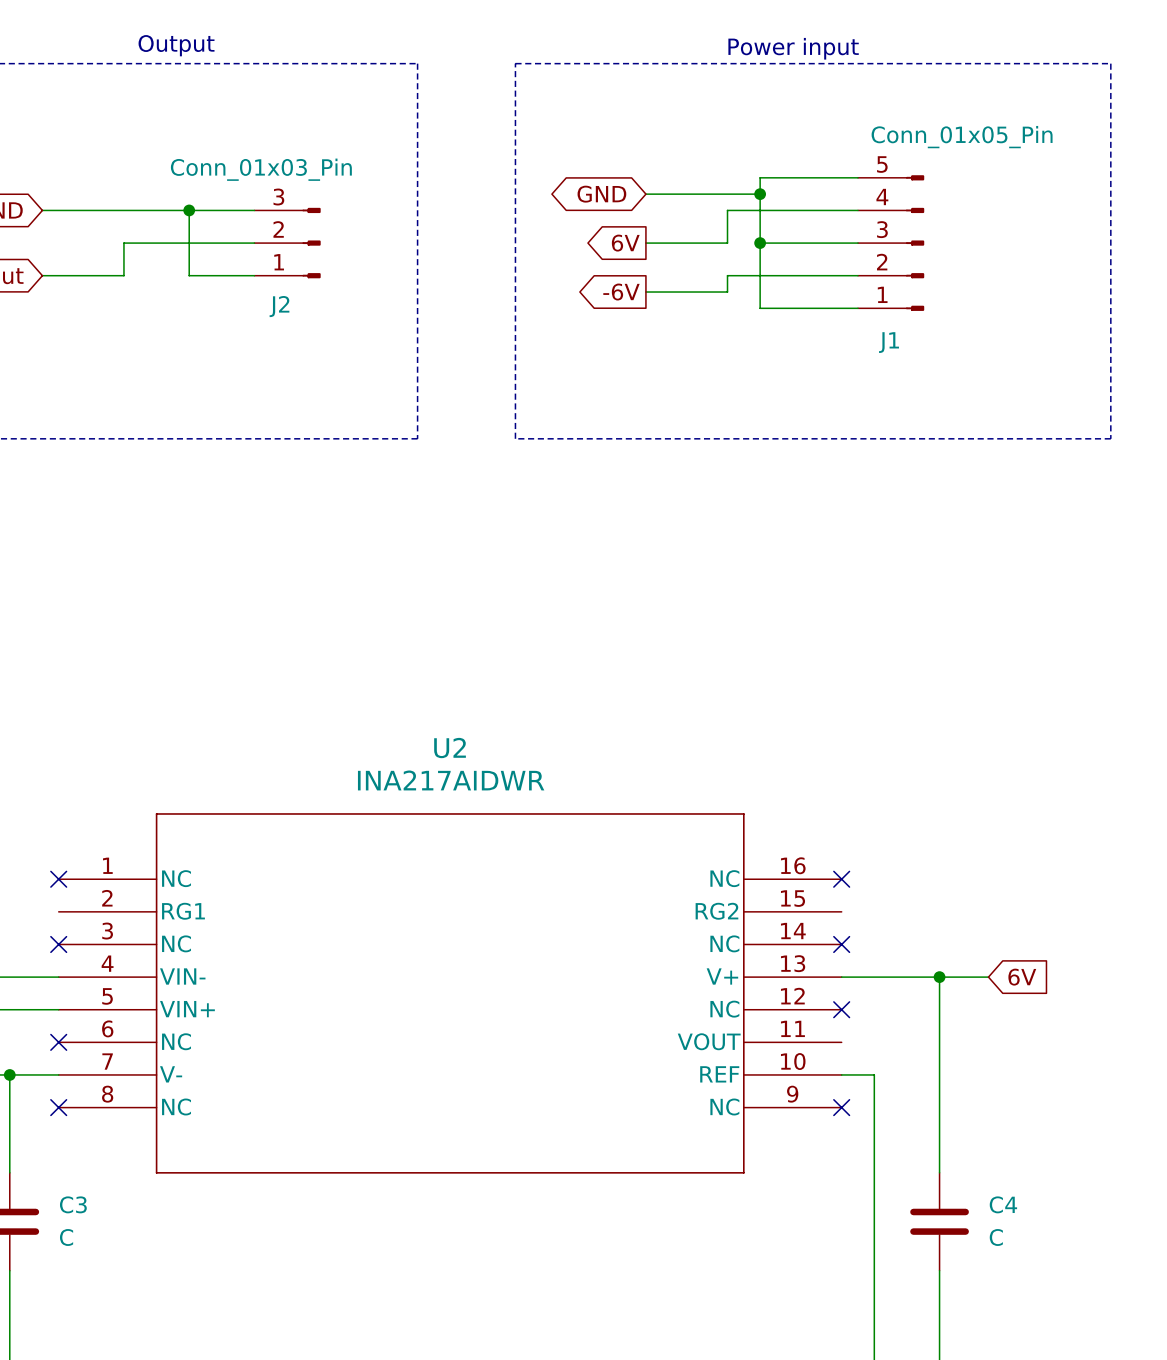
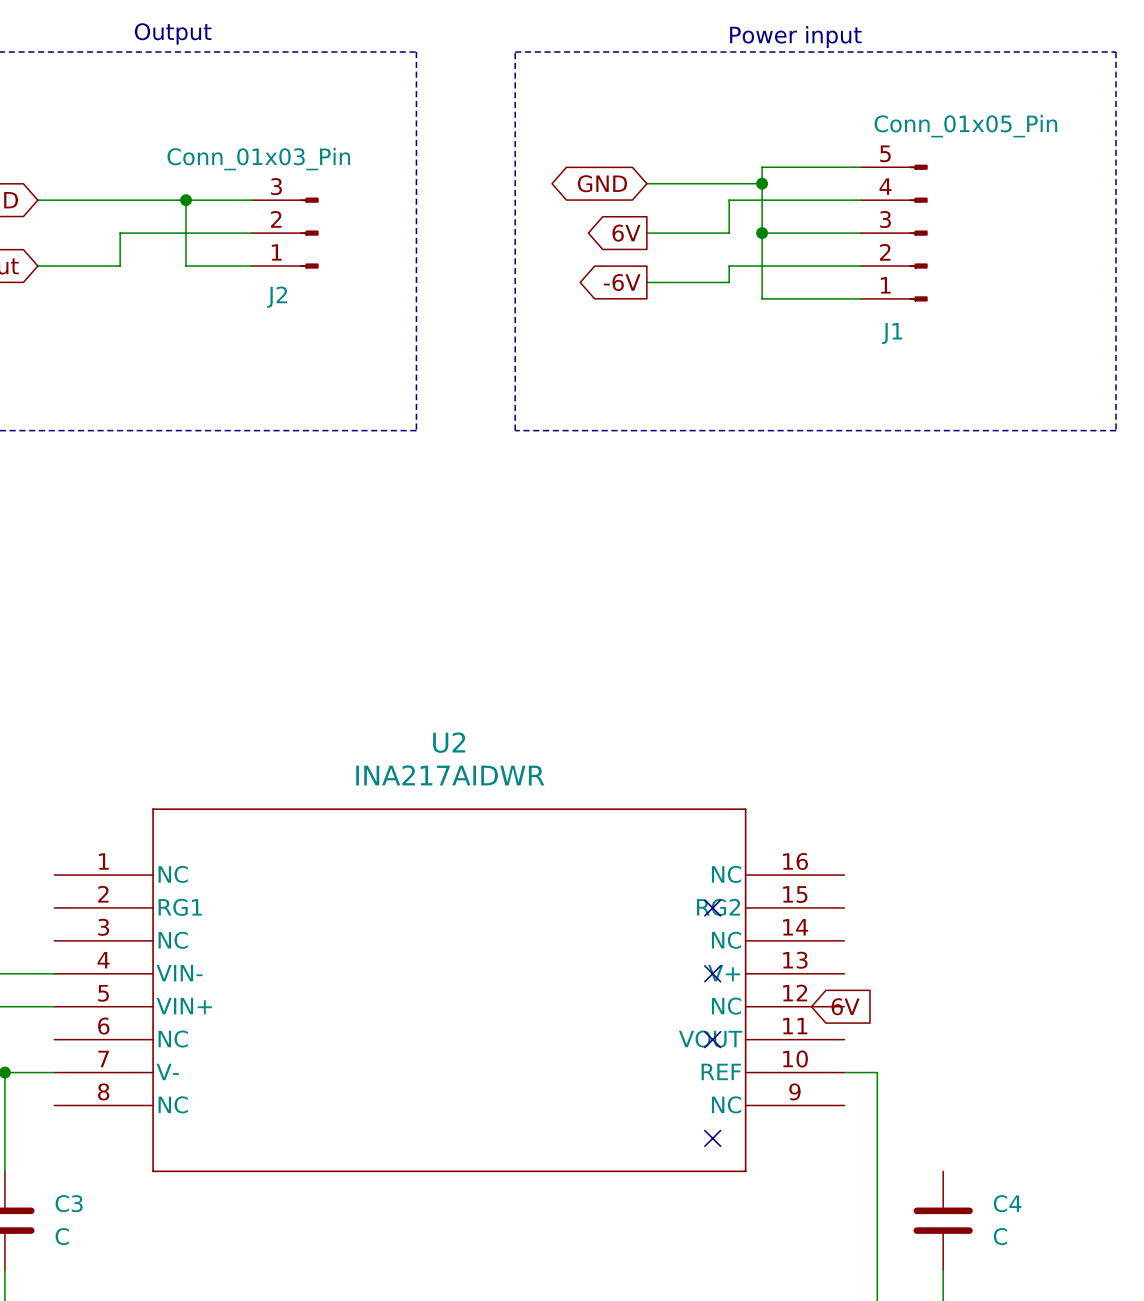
no-connect mark: (58, 879) -> none
no-connect mark: (841, 879) -> none
no-connect mark: none -> (712, 907)
no-connect mark: (58, 944) -> none
no-connect mark: (841, 944) -> none
no-connect mark: none -> (712, 973)
wire: (841, 977) (988, 977) -> none
wire: (939, 977) (939, 1172) -> none
junction: (939, 977) -> none
global label position: 6V (1022, 977) -> 6V (845, 1006)
no-connect mark: (841, 1009) -> none
no-connect mark: (58, 1042) -> none
no-connect mark: none -> (712, 1039)
no-connect mark: (58, 1107) -> none
no-connect mark: (841, 1107) -> none
no-connect mark: none -> (712, 1138)

